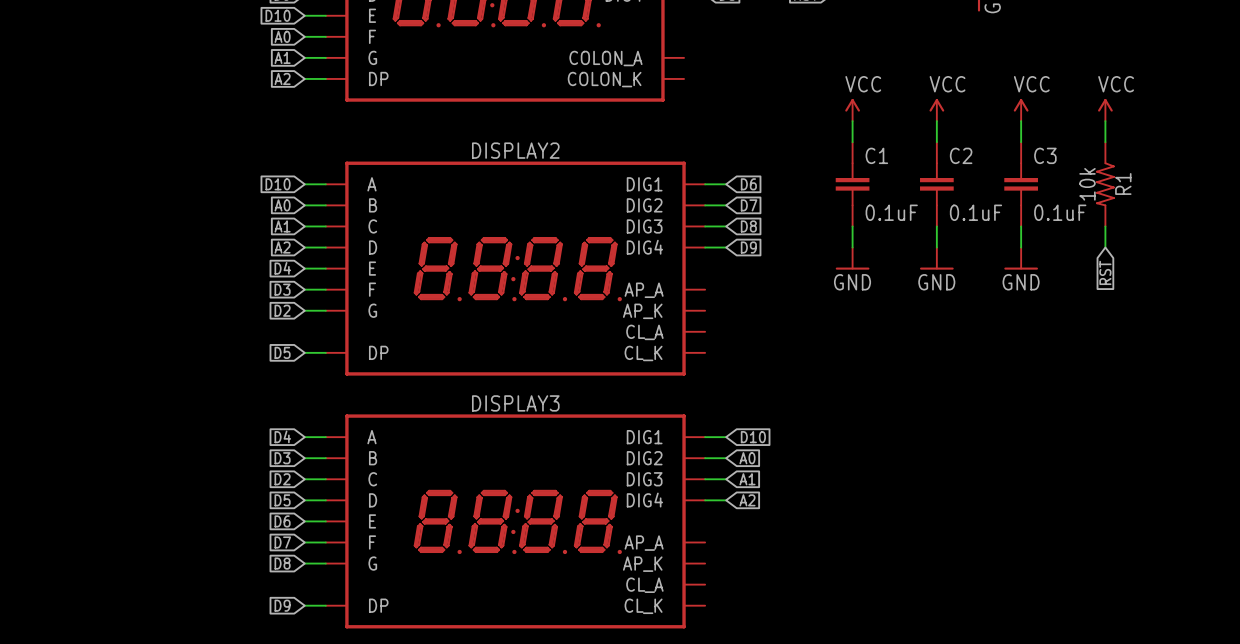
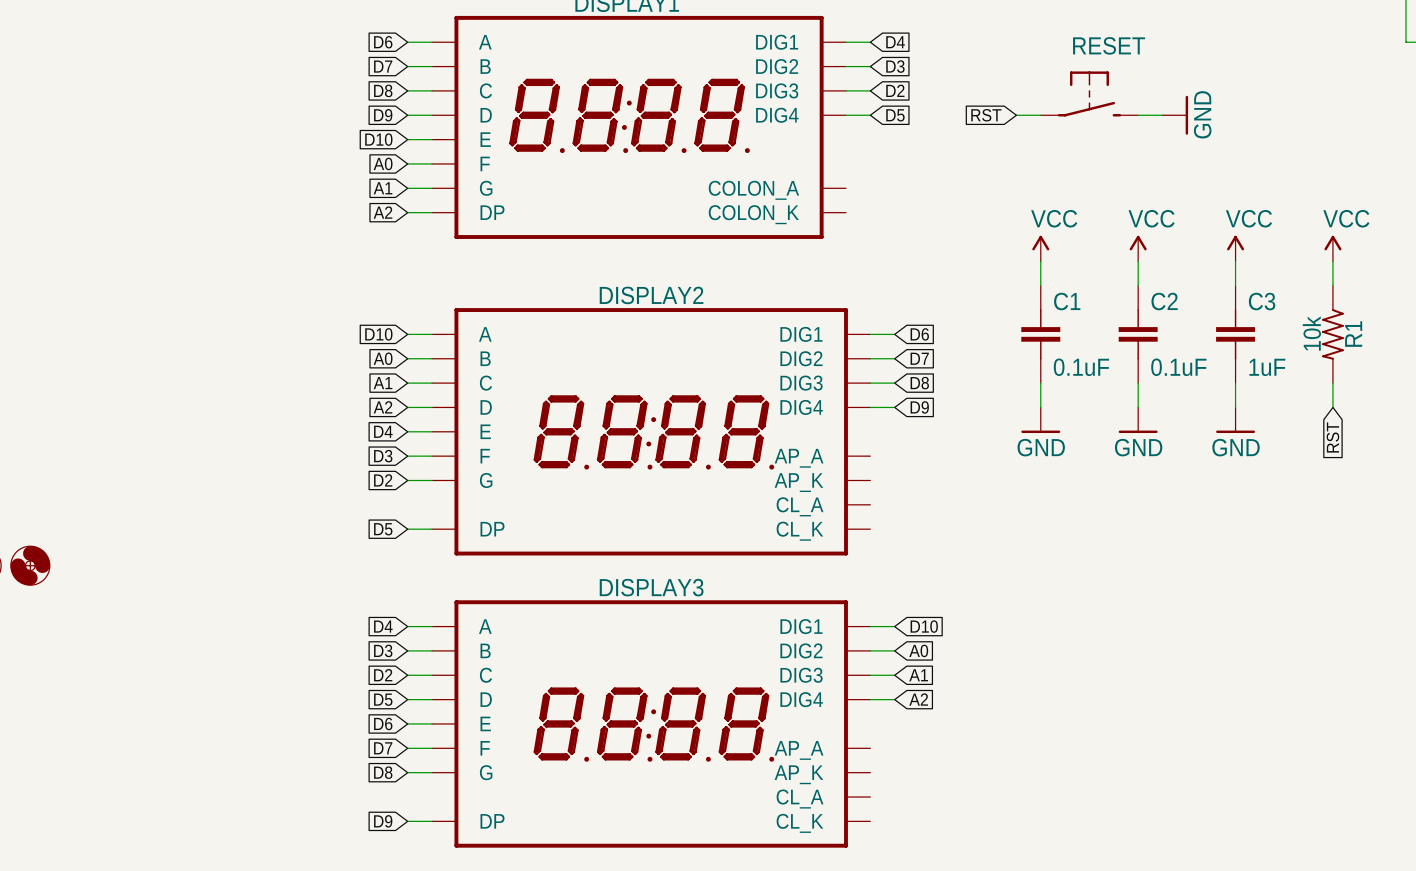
C3 value: 0.1uF (1060, 212) -> 1uF (1267, 367)

